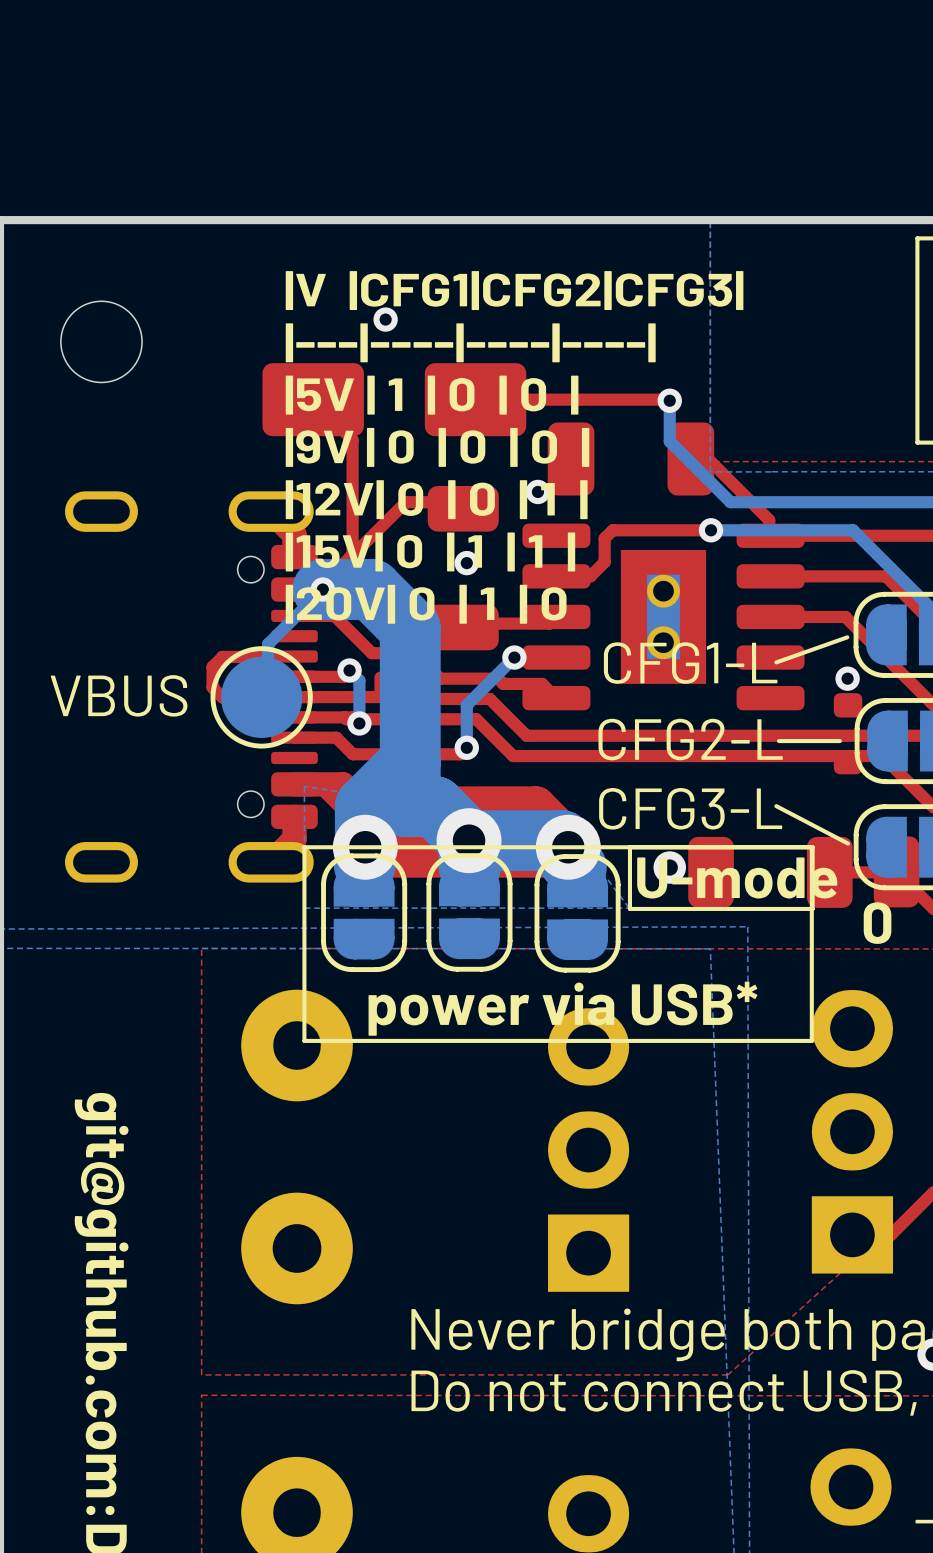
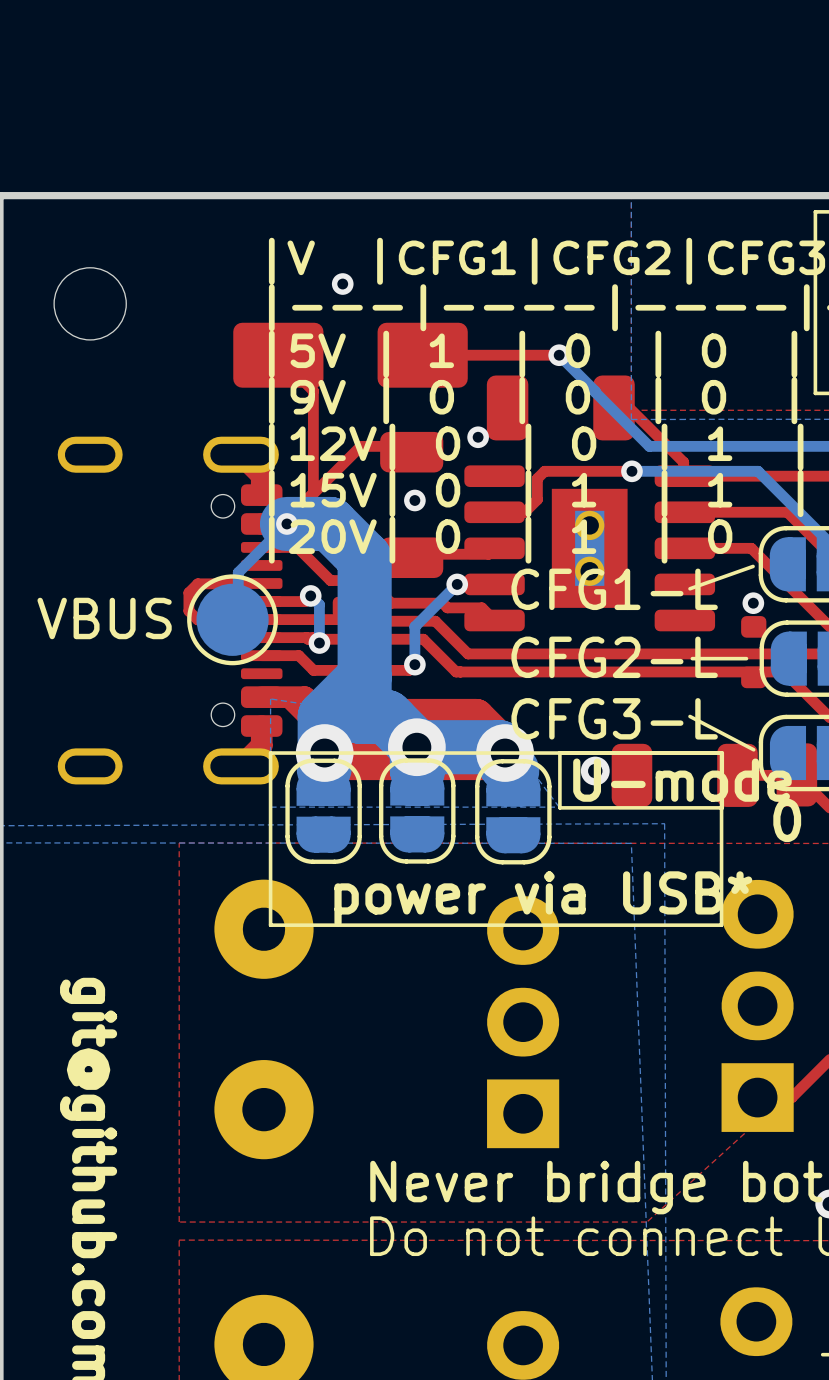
top track: (629, 399) (669, 400) -> none
bottom track: (669, 400) (669, 440) -> (559, 355) (595, 391)
via position: (669, 400) -> (559, 355)

